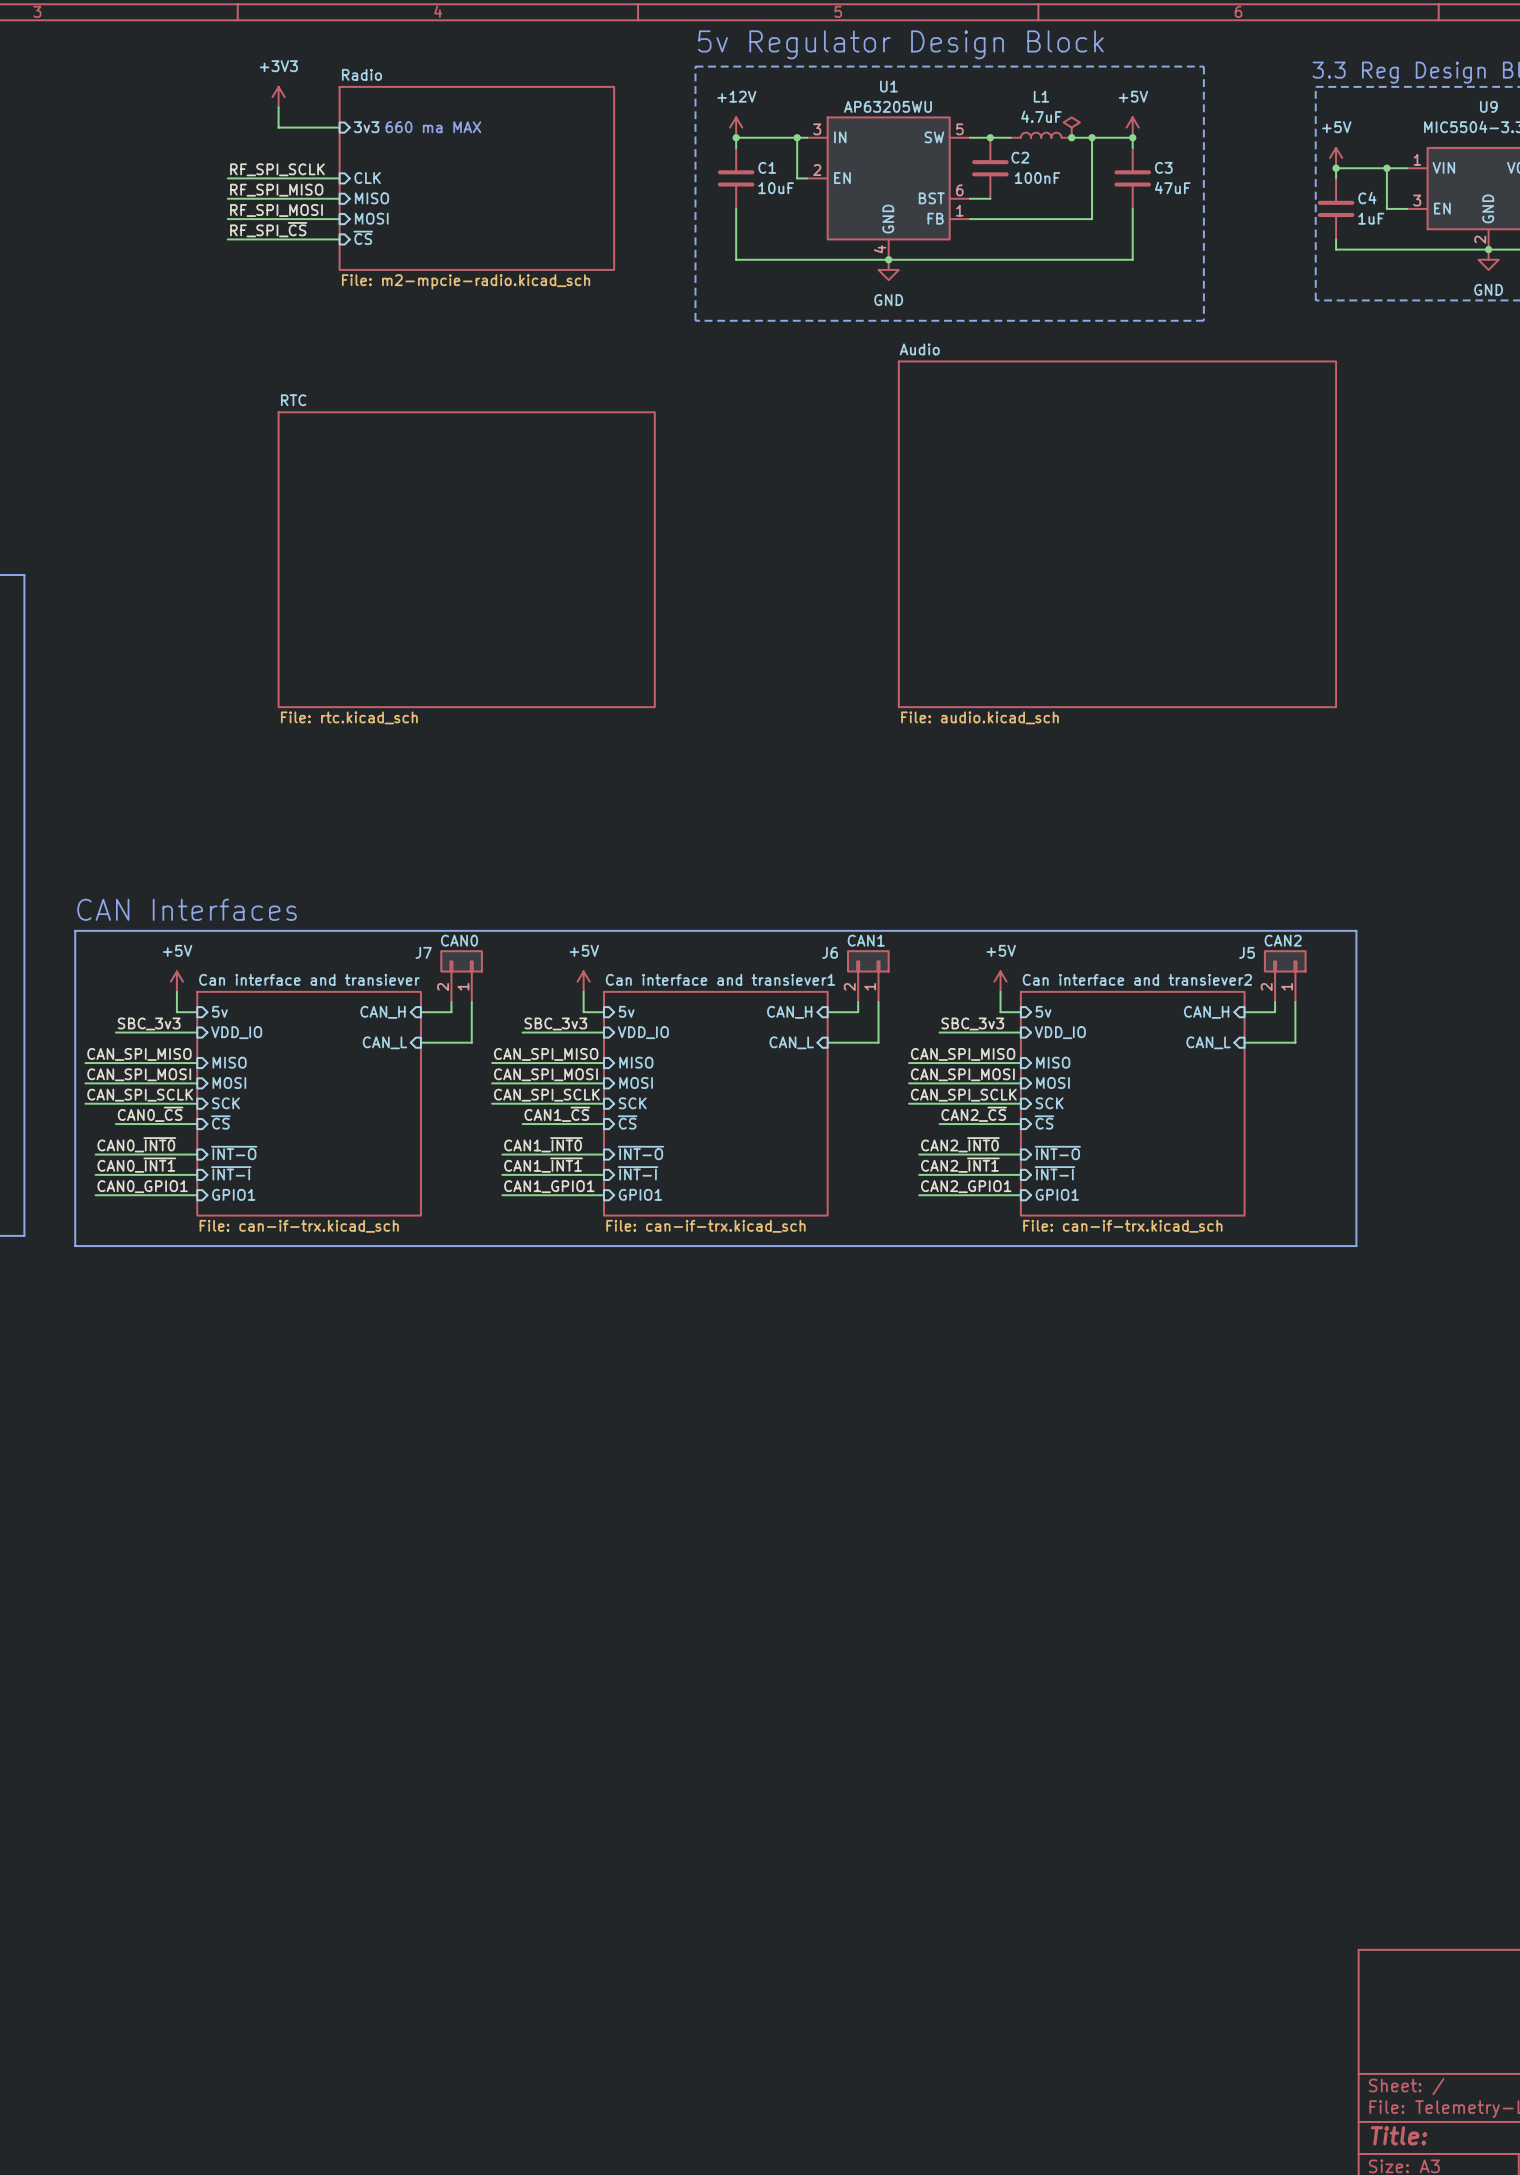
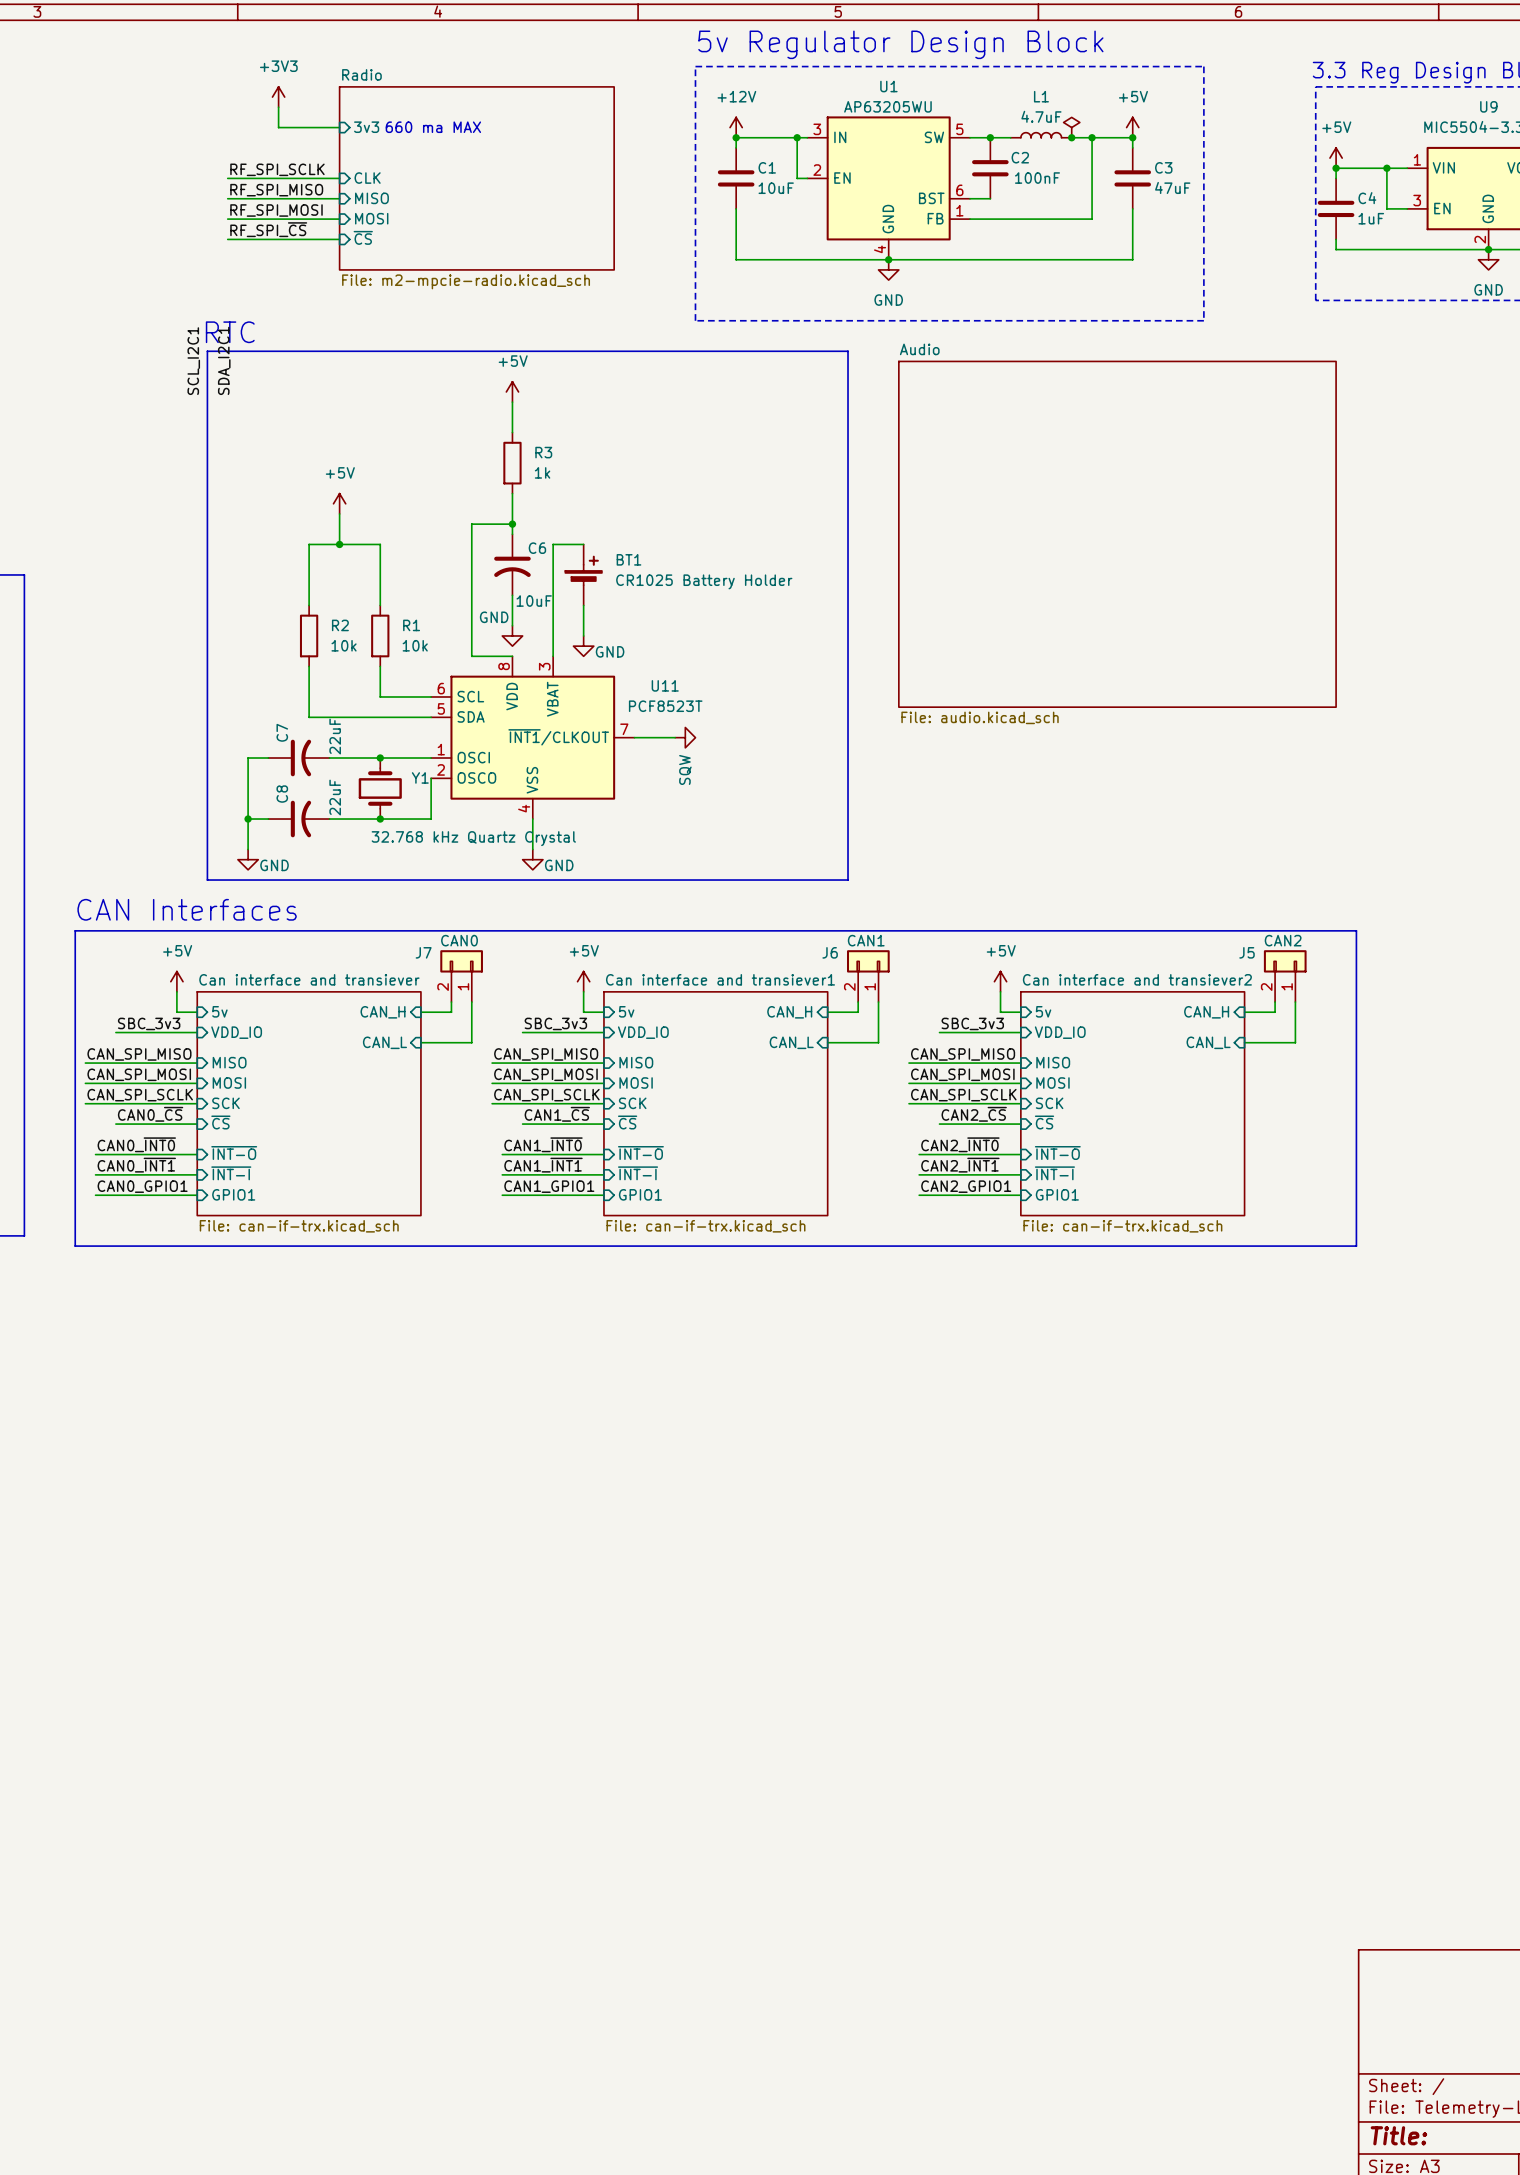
text: none -> RTC (230, 332)
line: none -> (207, 351) (848, 351) (848, 880) (207, 880) (207, 351)
label: none -> SDA_I2C1 (224, 360)
label: none -> SCL_I2C1 (193, 361)
power symbol: none -> +5V (512, 391)
wire: none -> (512, 402) (512, 432)
R3: none -> 1k (512, 463)
wire: none -> (512, 493) (512, 534)
power symbol: none -> +5V (339, 503)
wire: none -> (339, 513) (339, 544)
wire: none -> (512, 524) (471, 524) (471, 656) (512, 656)
junction: none -> (512, 524)
junction: none -> (339, 544)
wire: none -> (583, 544) (553, 544) (553, 656)
sheet RTC: File: rtc.kicad_sch (466, 559) -> none
C6: none -> 10uF (512, 564)
BT1: none -> CR1025 Battery Holder (583, 574)
wire: none -> (512, 595) (512, 625)
wire: none -> (309, 605) (309, 544) (380, 544) (380, 605)
wire: none -> (583, 605) (583, 635)
R2: none -> 10k (309, 635)
R1: none -> 10k (380, 635)
power symbol: none -> GND (512, 635)
power symbol: none -> GND (583, 646)
wire: none -> (309, 666) (309, 717) (431, 717)
wire: none -> (380, 666) (380, 696) (431, 696)
U11: none -> PCF8523T (532, 737)
wire: none -> (634, 737) (675, 737)
power symbol: none -> SQW (685, 737)
wire: none -> (268, 758) (248, 758) (248, 849)
C7: none -> 22uF (298, 758)
wire: none -> (329, 758) (431, 758)
junction: none -> (380, 758)
wire: none -> (431, 778) (431, 819) (329, 819)
Y1: none -> 32.768 kHz Quartz Crystal (380, 788)
wire: none -> (248, 819) (268, 819)
junction: none -> (248, 819)
C8: none -> 22uF (298, 819)
junction: none -> (380, 819)
wire: none -> (532, 819) (532, 849)
power symbol: none -> GND (248, 859)
power symbol: none -> GND (532, 859)

